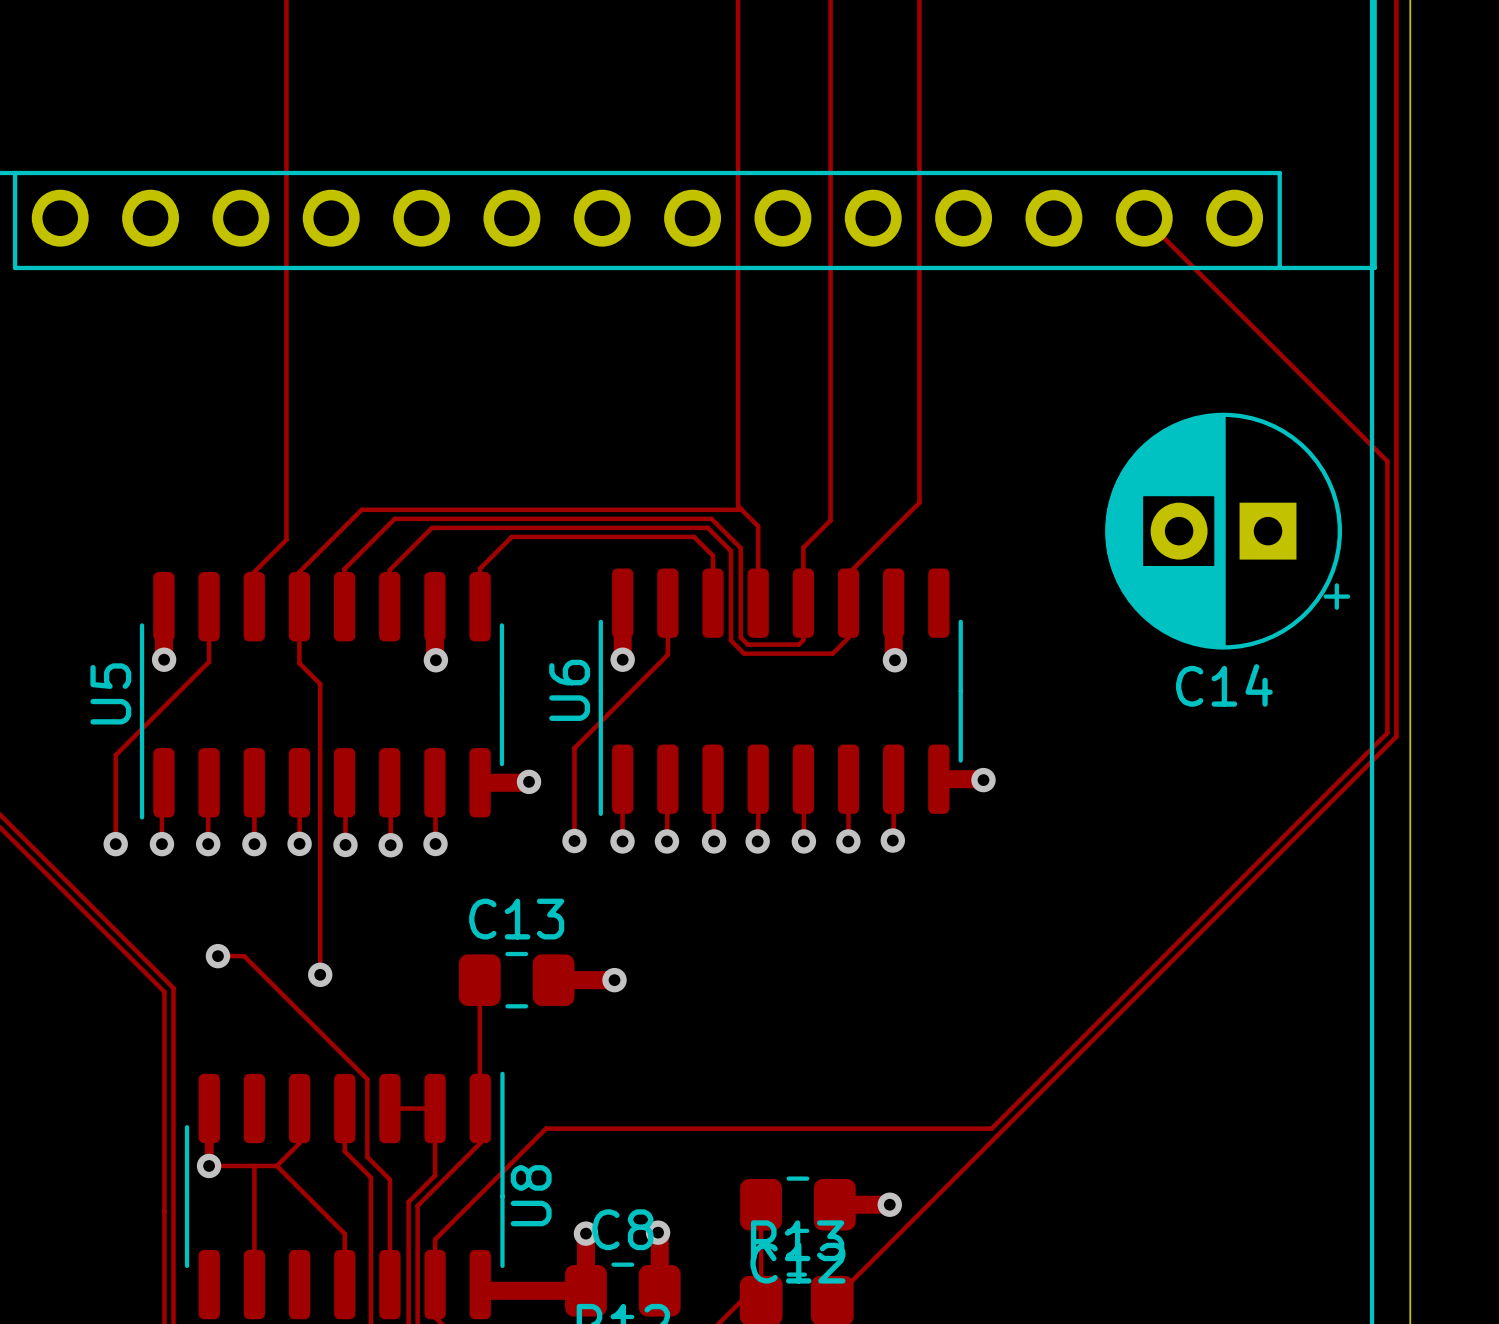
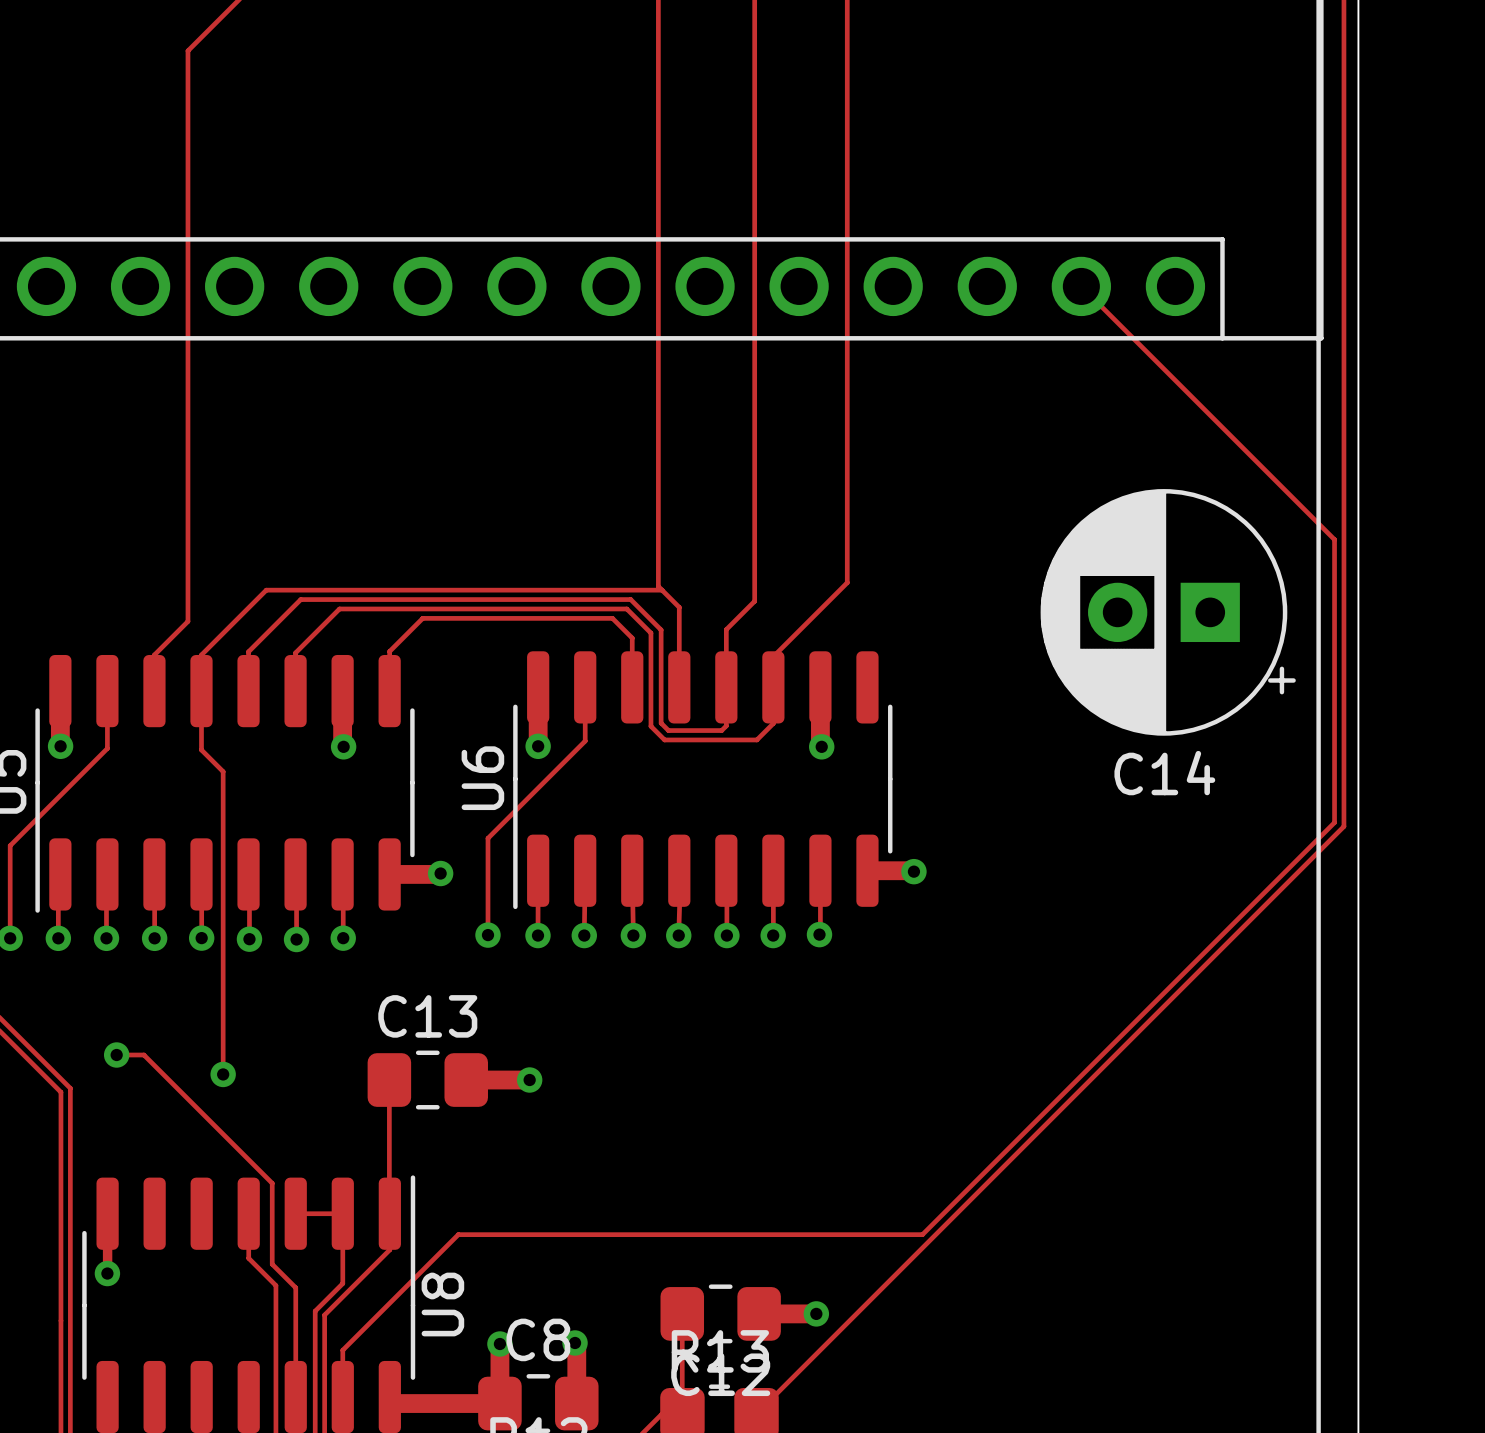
track: (299, 1108) (299, 1143) (276, 1165) -> none
track: (209, 1165) (276, 1165) -> none
track: (254, 1165) (254, 1284) -> none
track: (276, 1165) (344, 1233) (344, 1284) -> none

